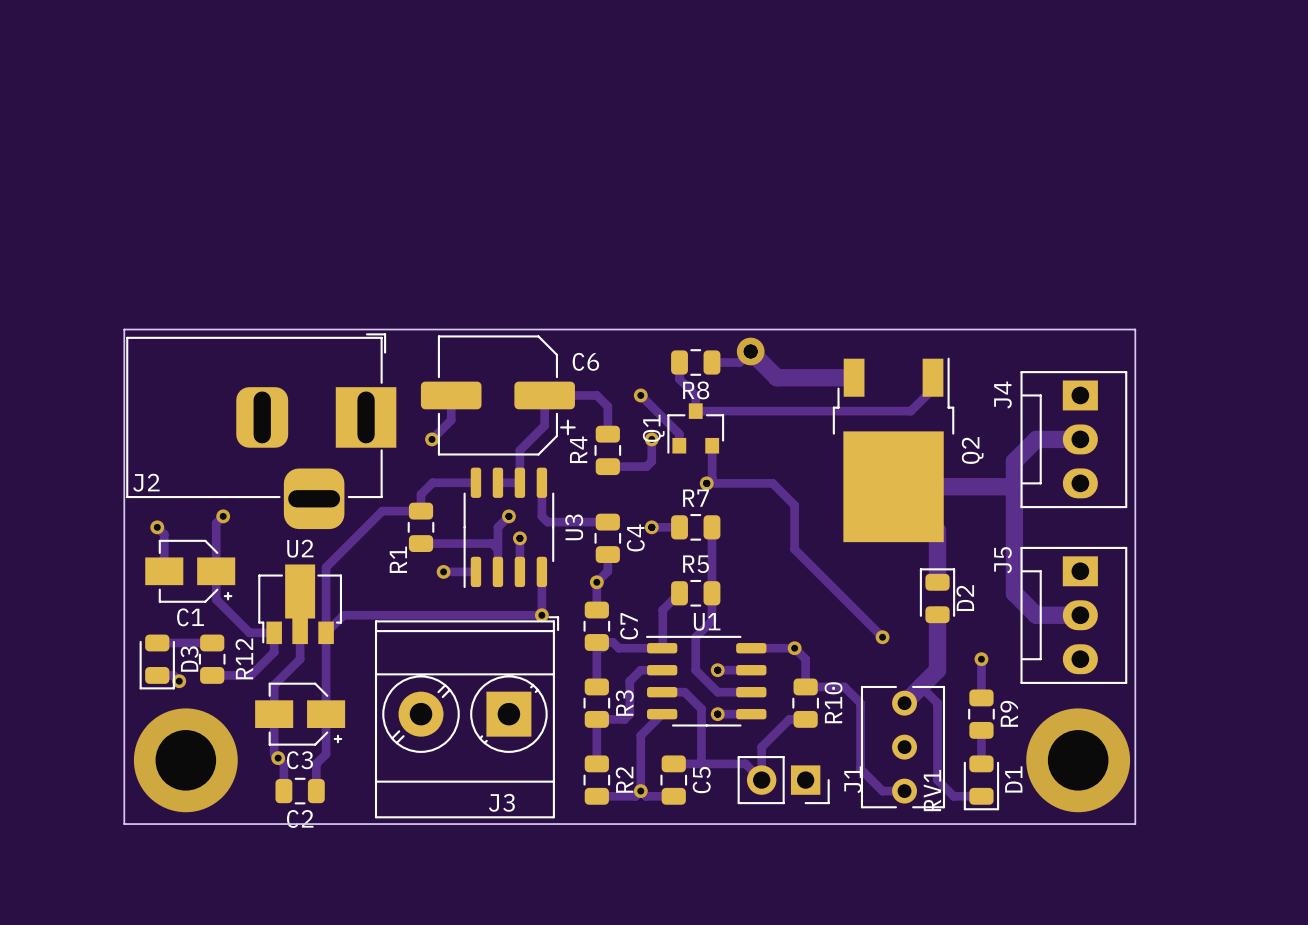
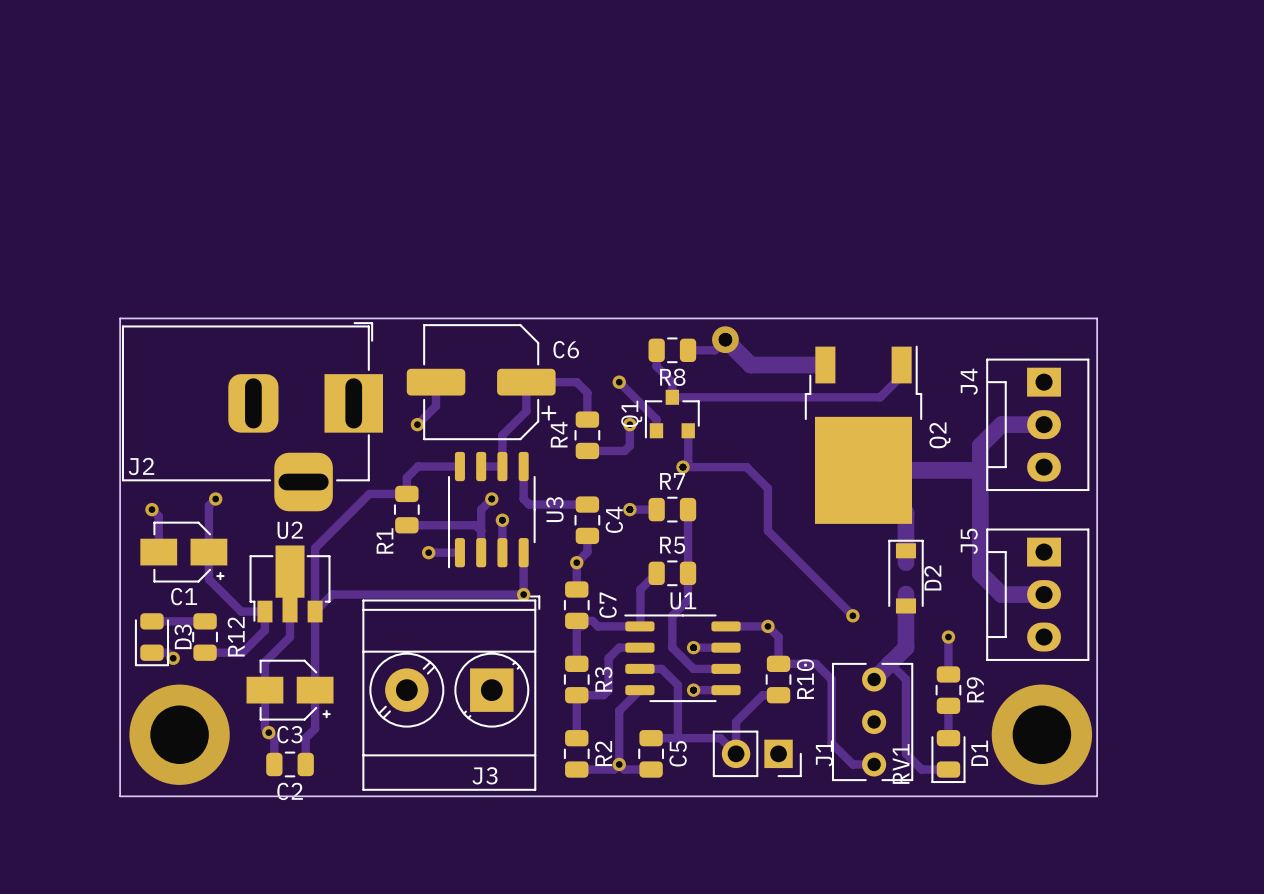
D2 footprint: [919, 568, 956, 624] -> [888, 539, 924, 614]

